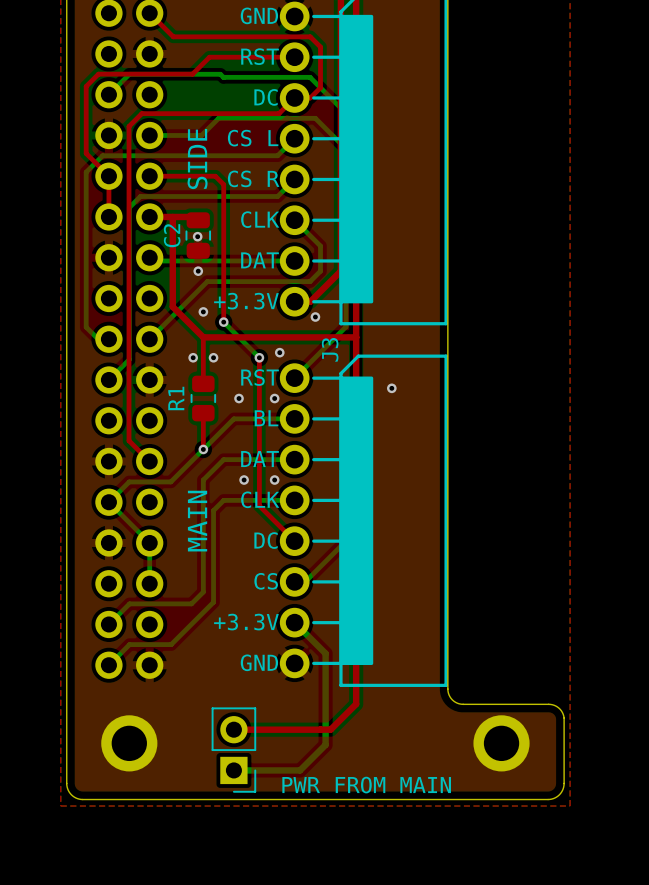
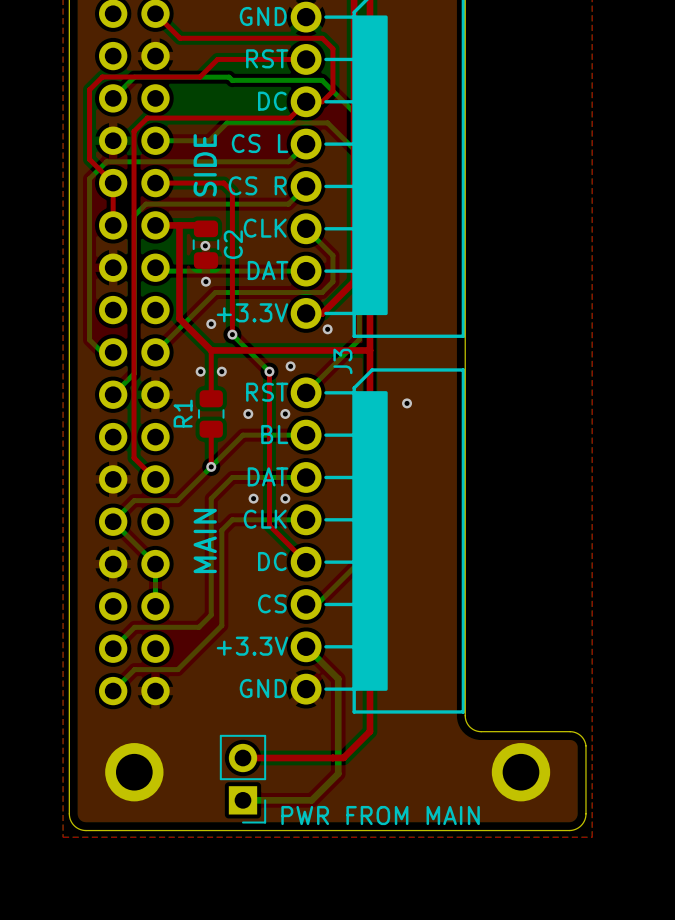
C2 name position: C2 (172, 235) -> C2 (233, 244)

